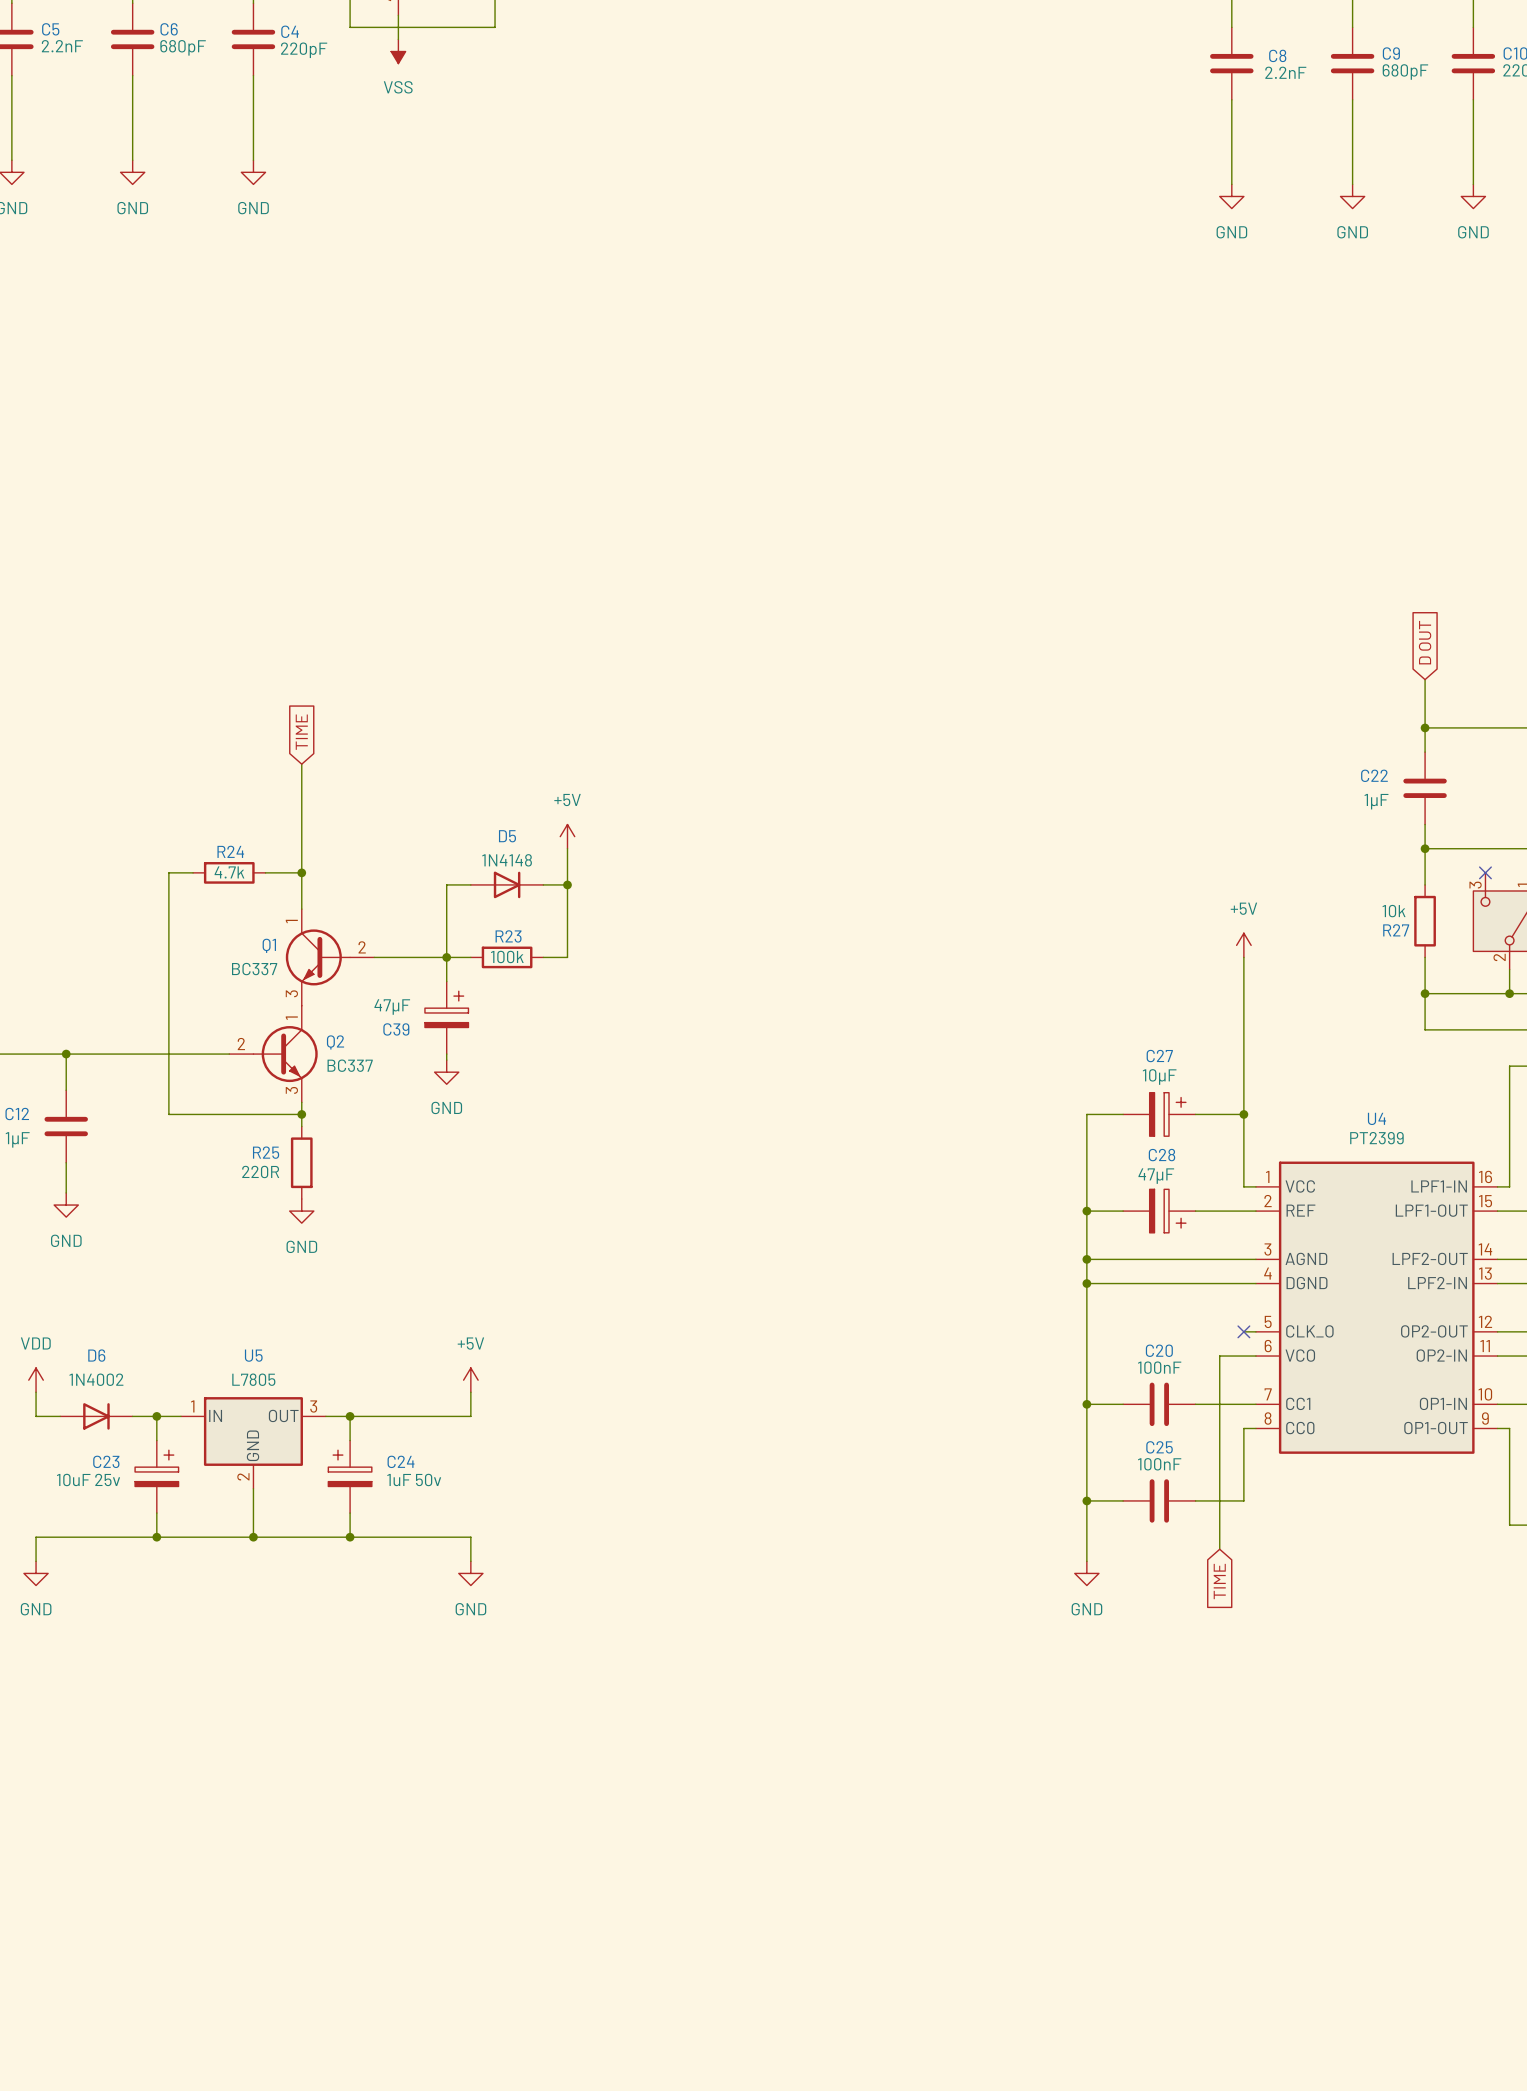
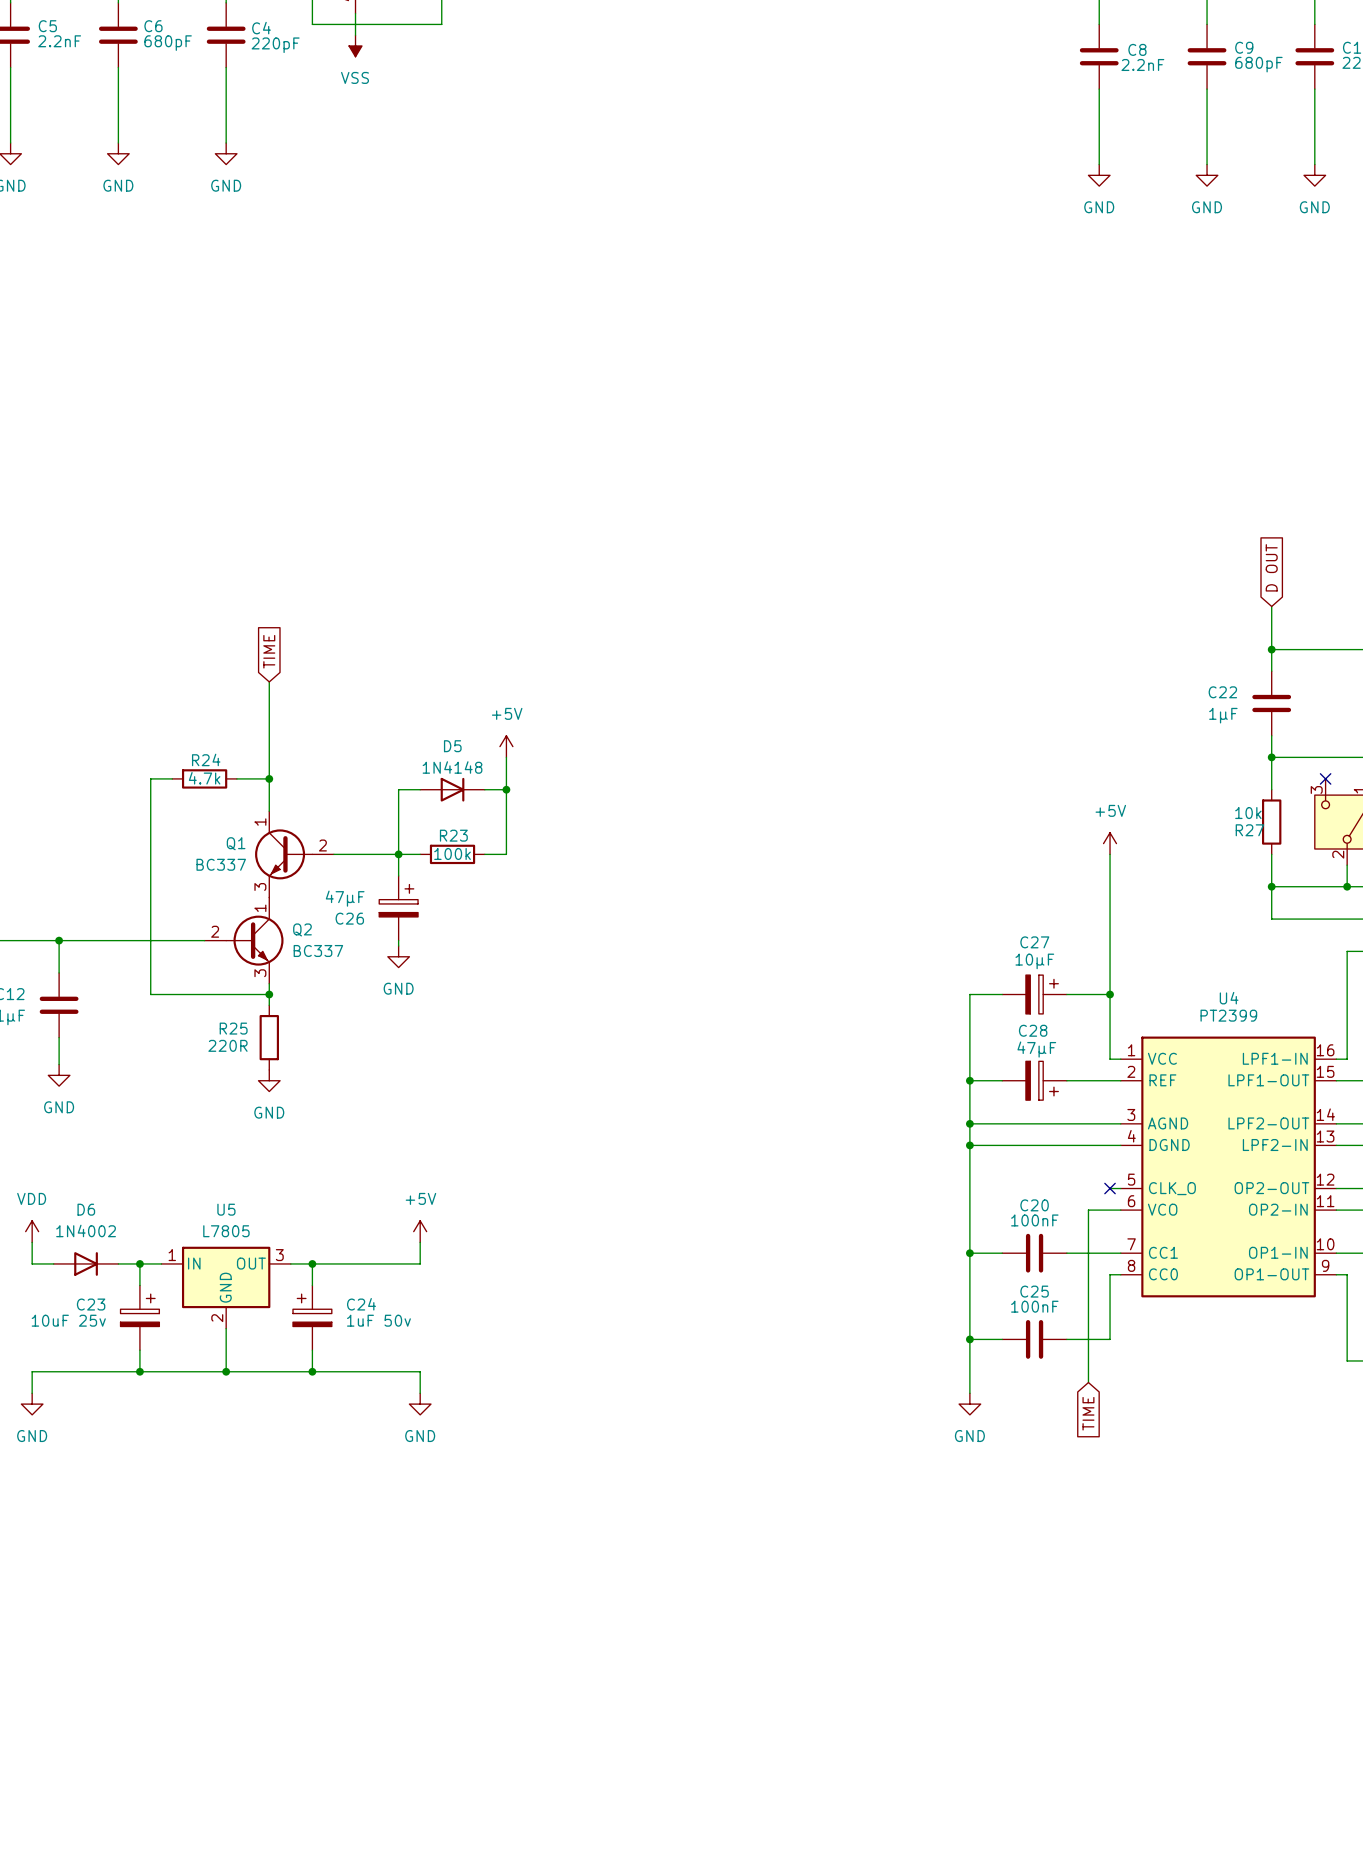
C39 name: C39 (396, 1029) -> C26 (349, 918)

